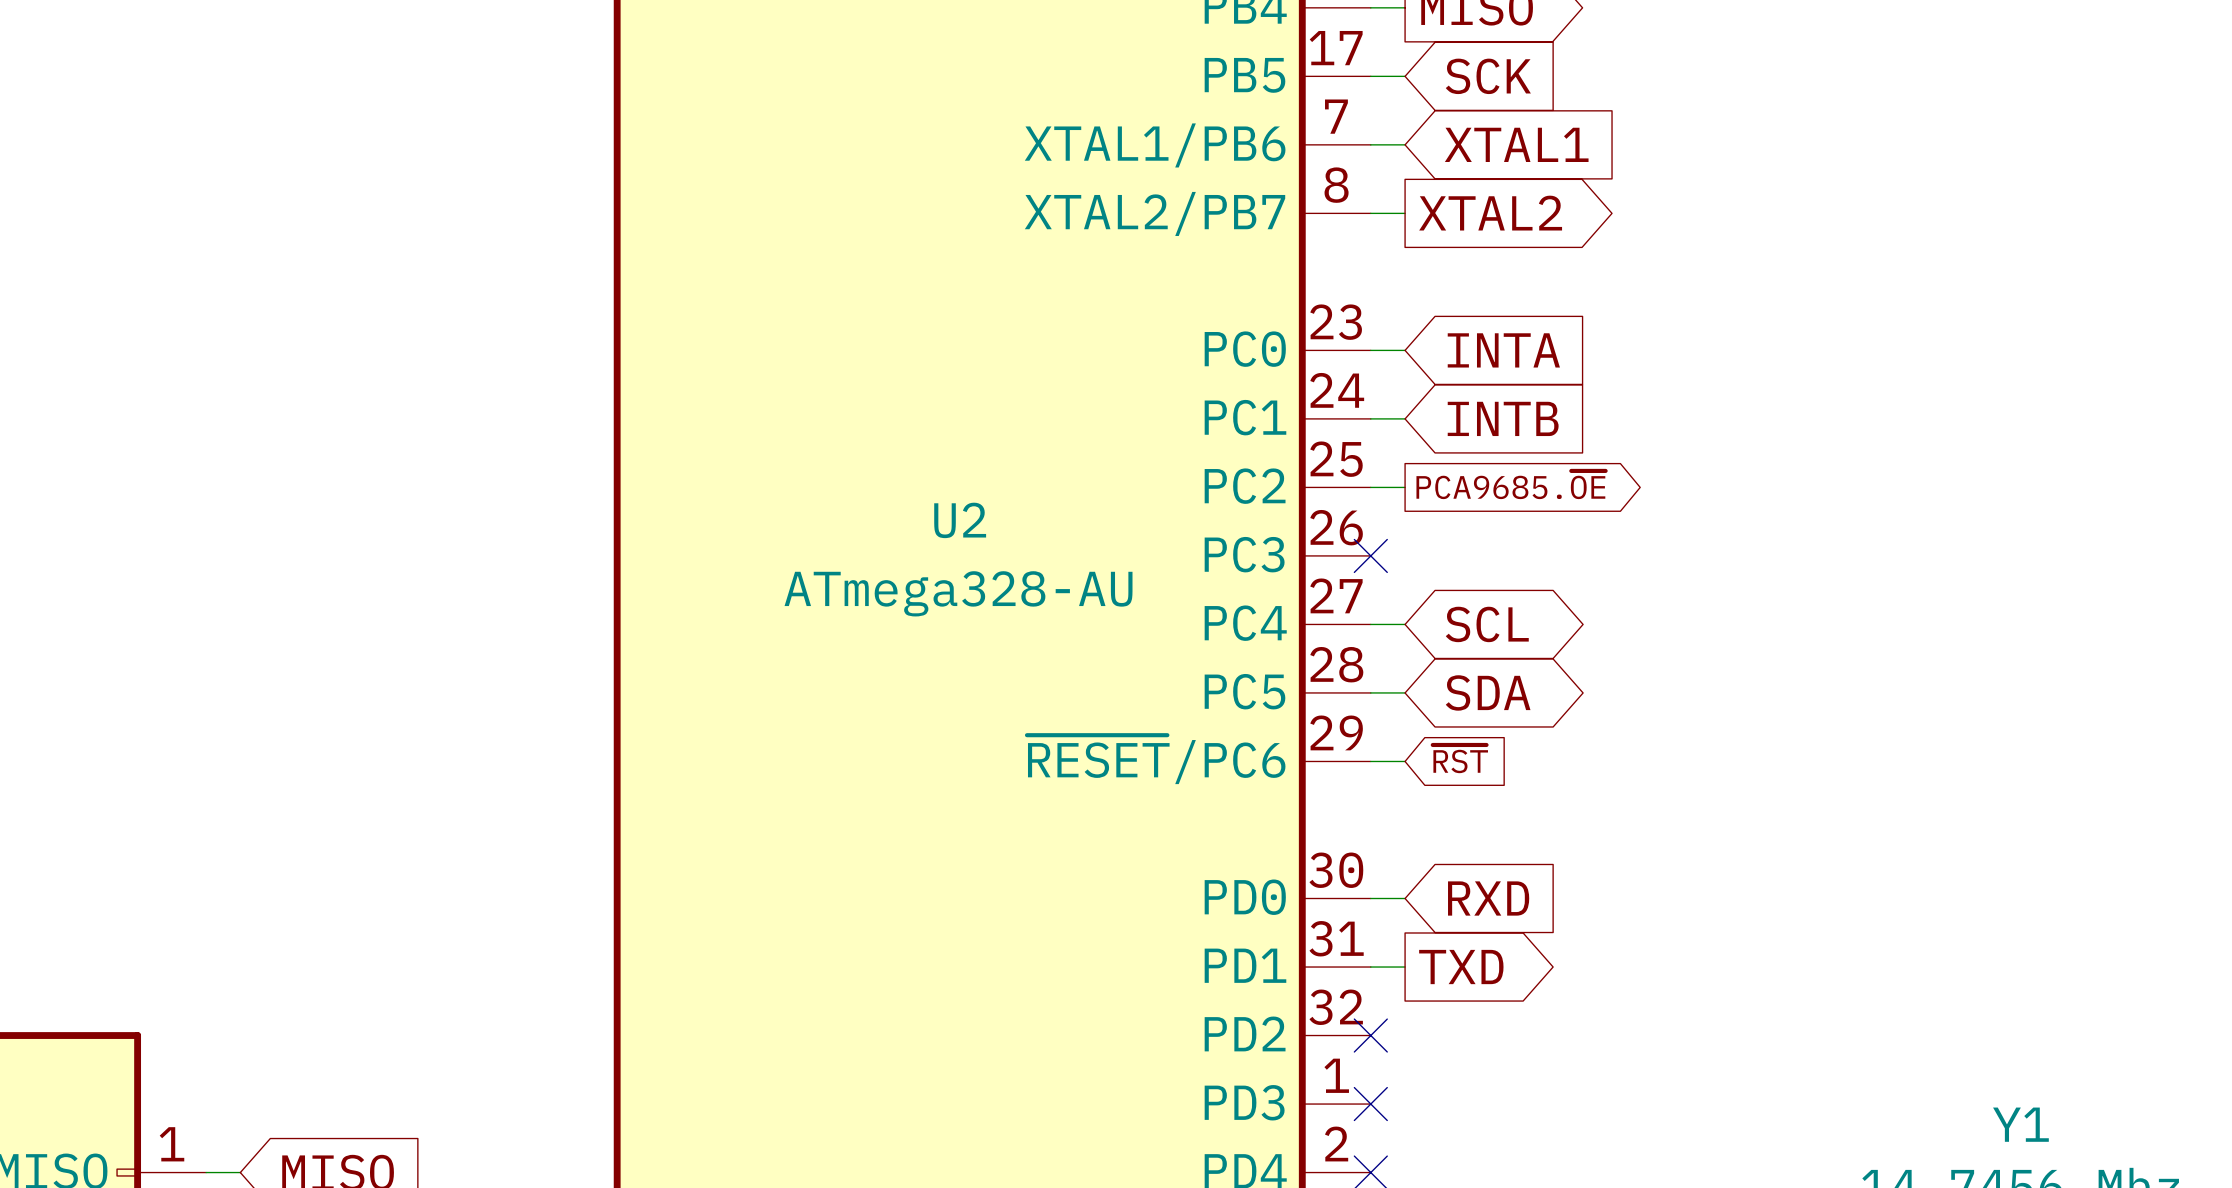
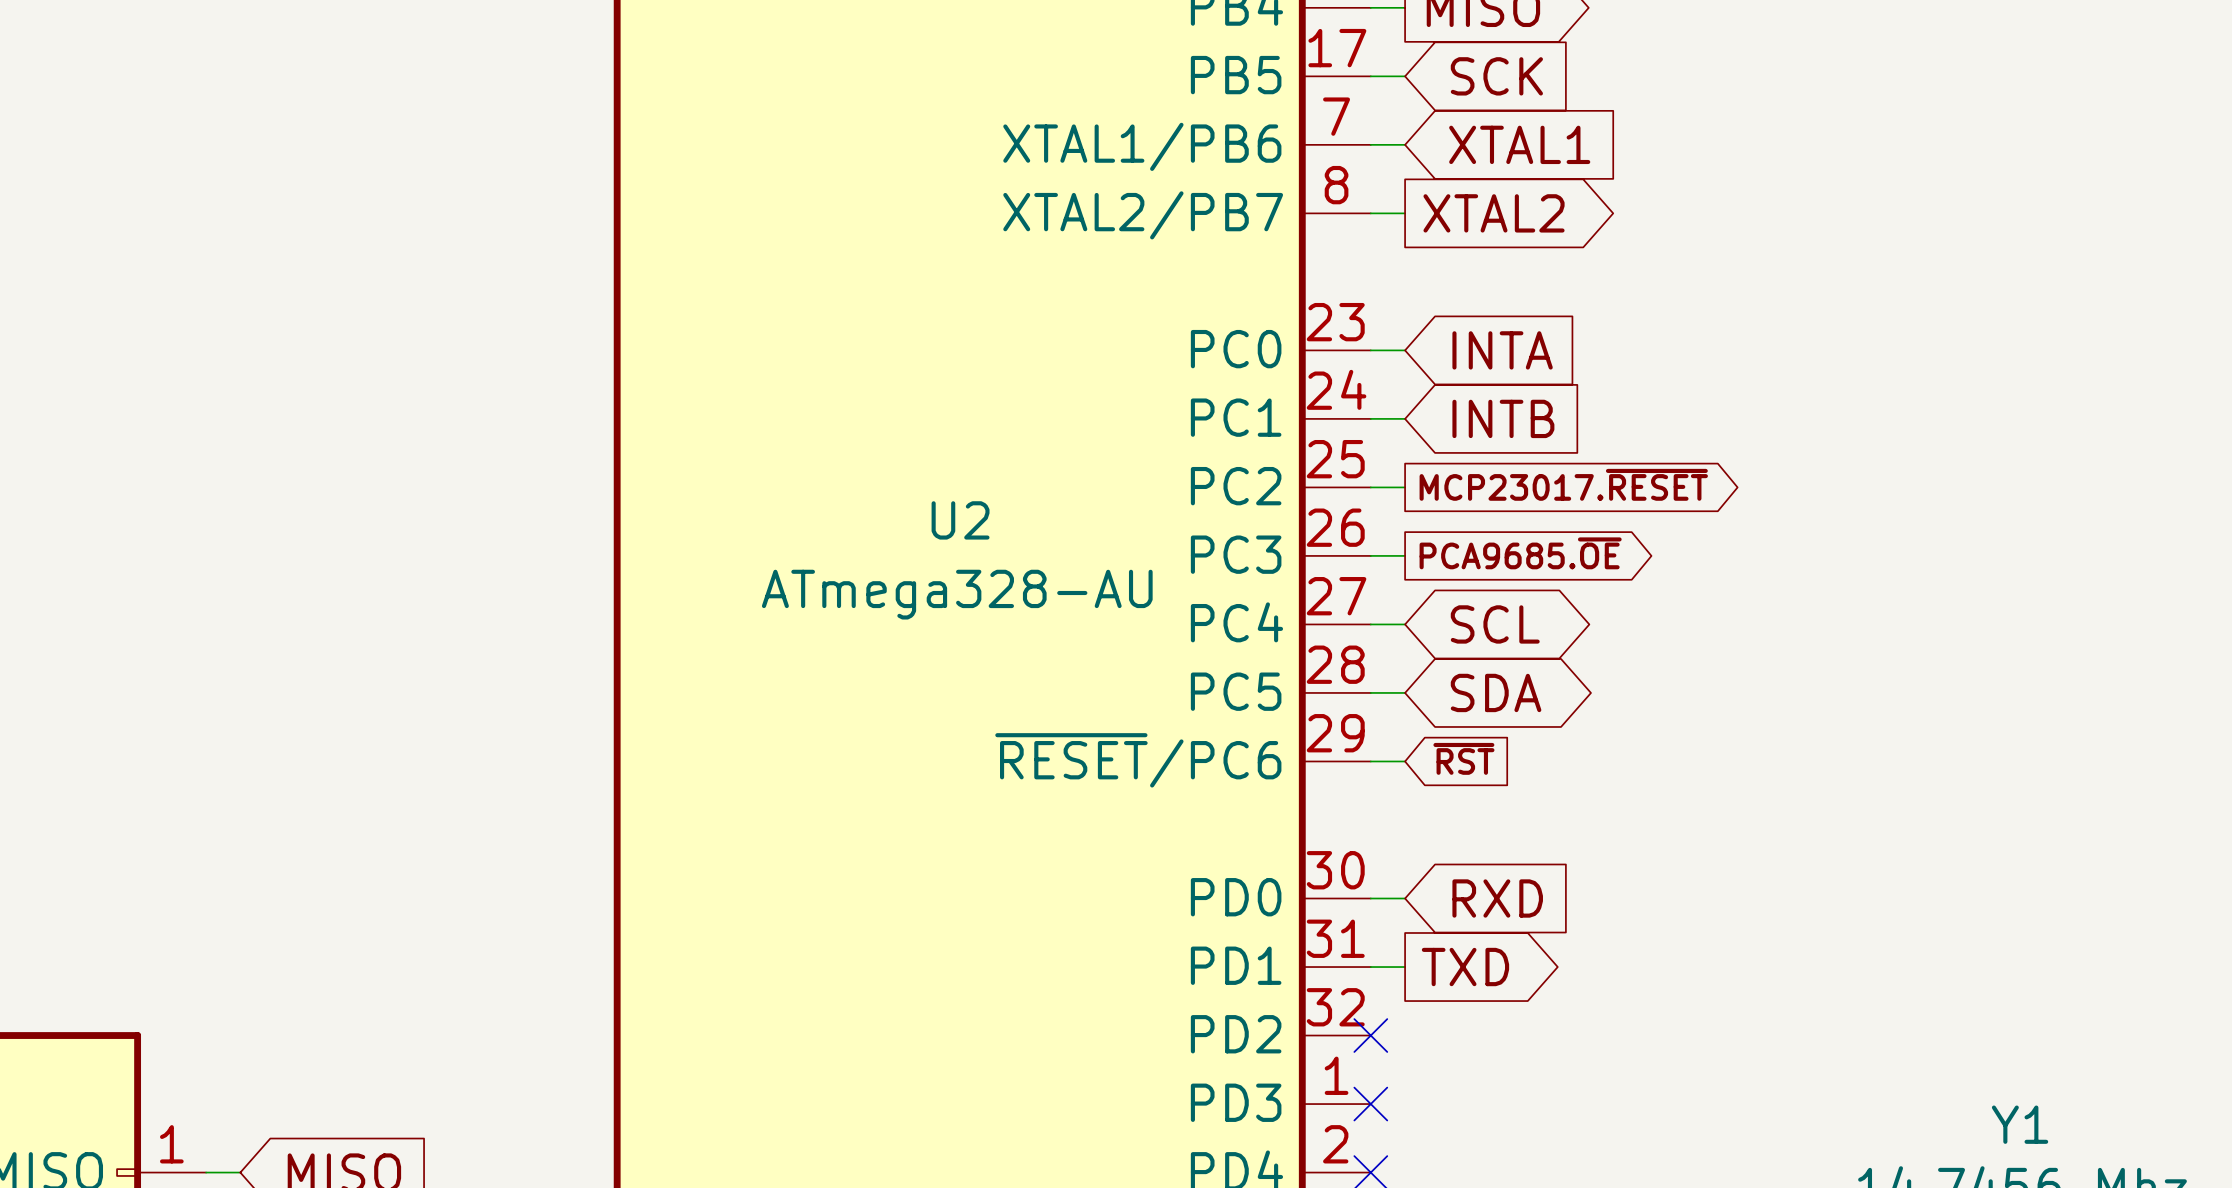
global label: PCA9685.~{OE} (1511, 485) -> MCP23017.~{RESET} (1563, 484)
global label: none -> PCA9685.~{OE} (1520, 553)
wire: none -> (1370, 555) (1405, 555)
no-connect mark: (1370, 555) -> none

